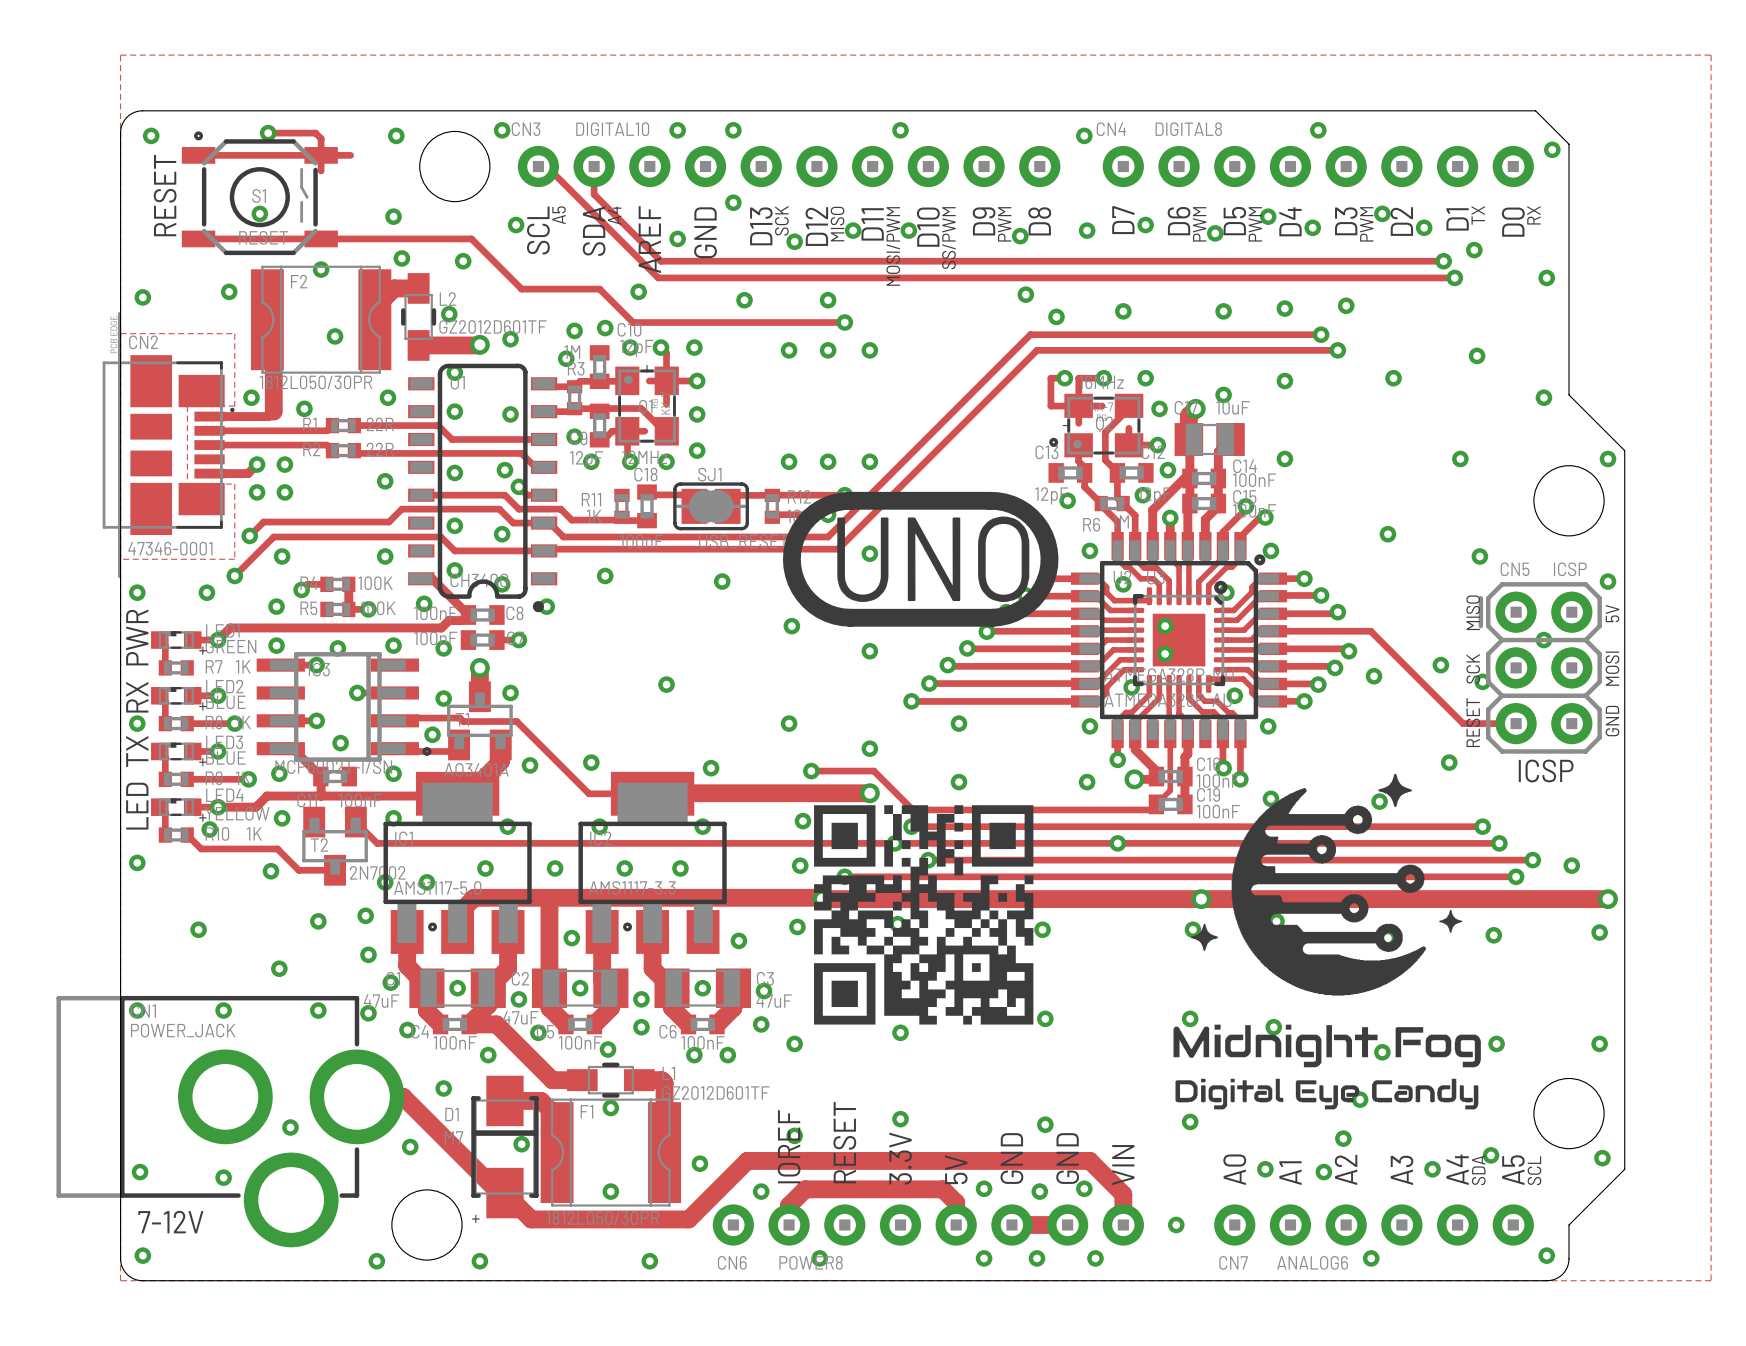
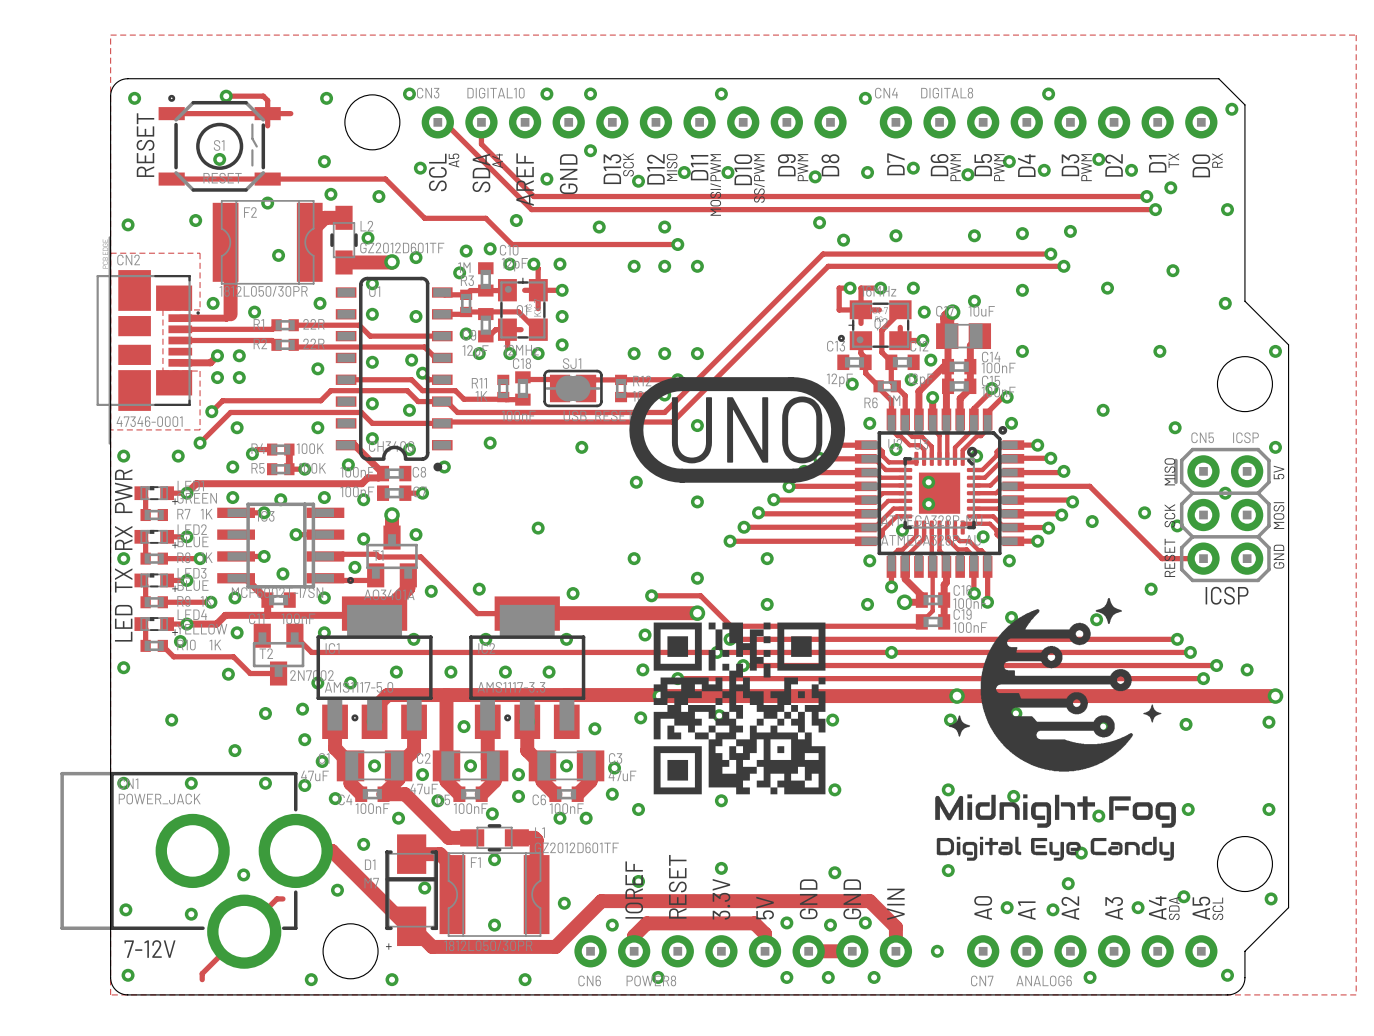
track: none -> (282, 898) (276, 898) (202, 973) (202, 979)

